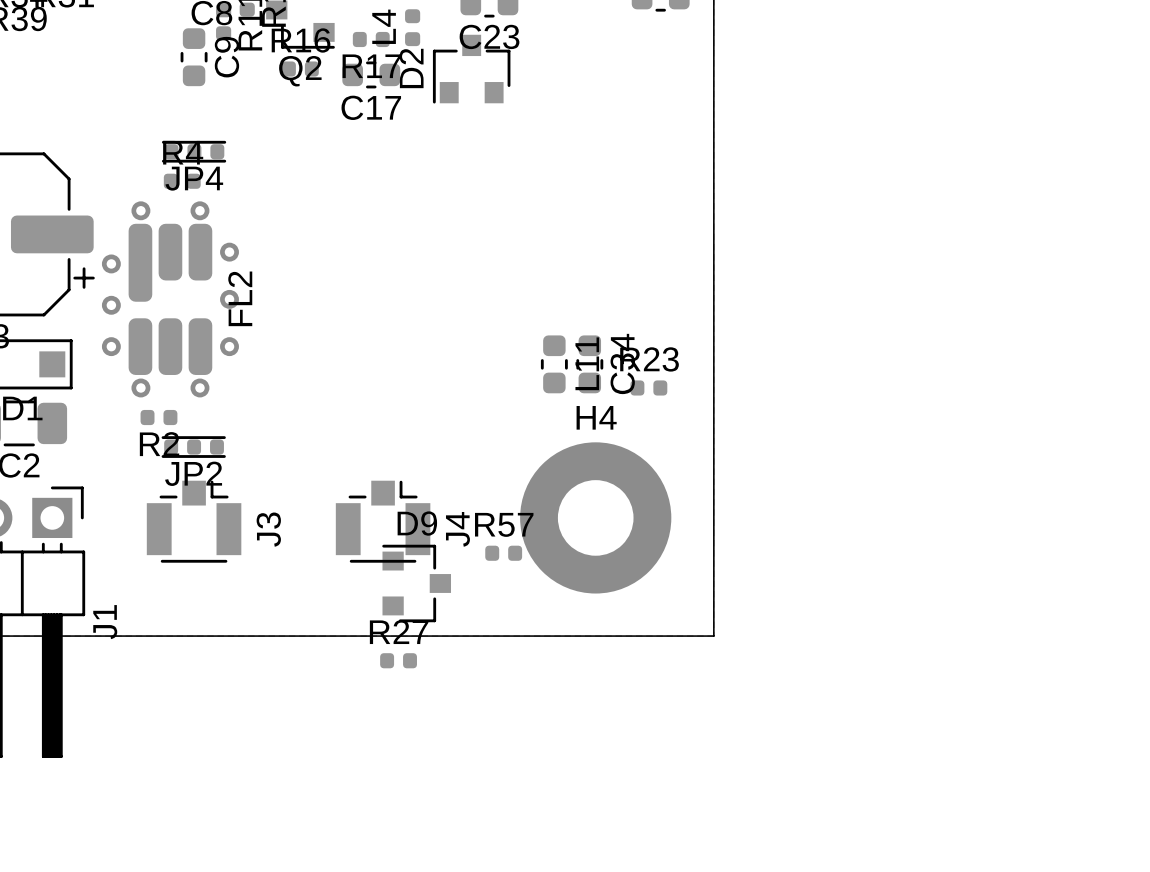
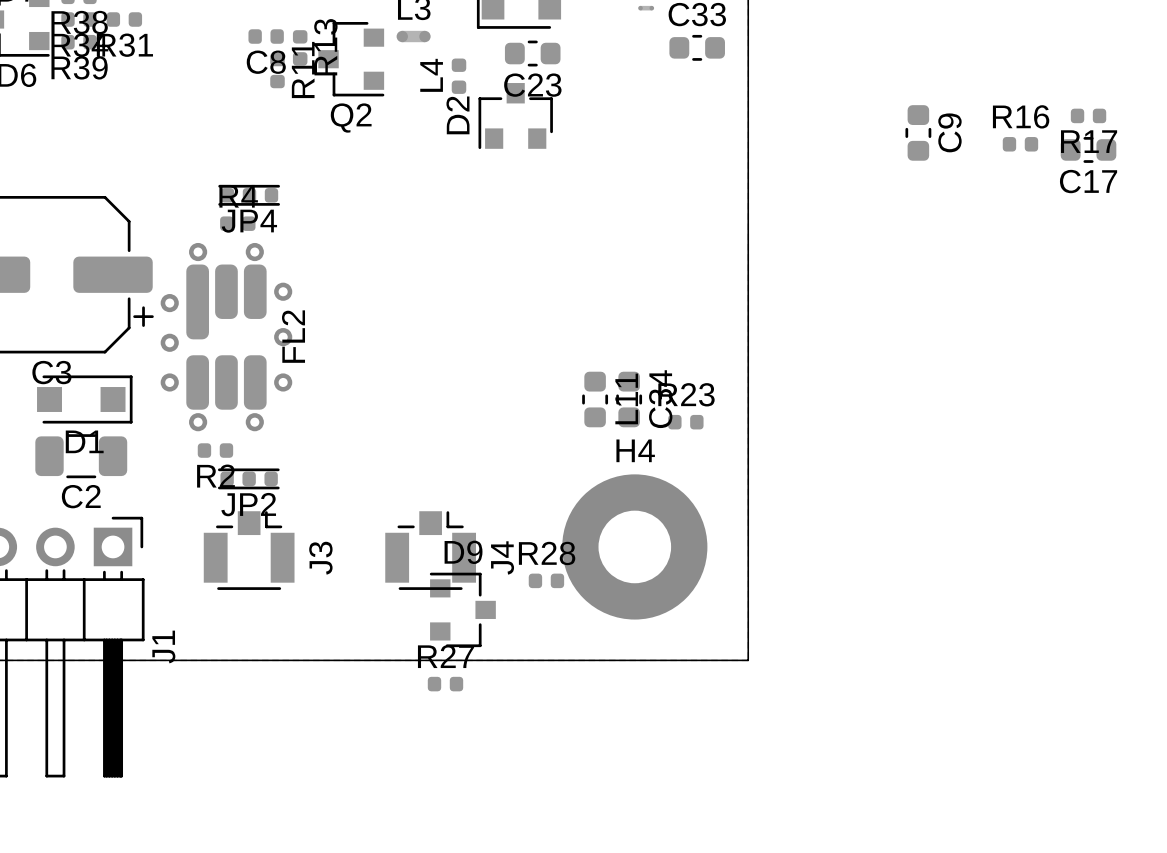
R17 position: (371, 39) -> (1088, 115)
C9 position: (194, 57) -> (918, 132)
R16 position: (300, 69) -> (1020, 144)
C17 position: (371, 74) -> (1088, 149)
R57 name: R57 (504, 524) -> R28 (547, 553)

